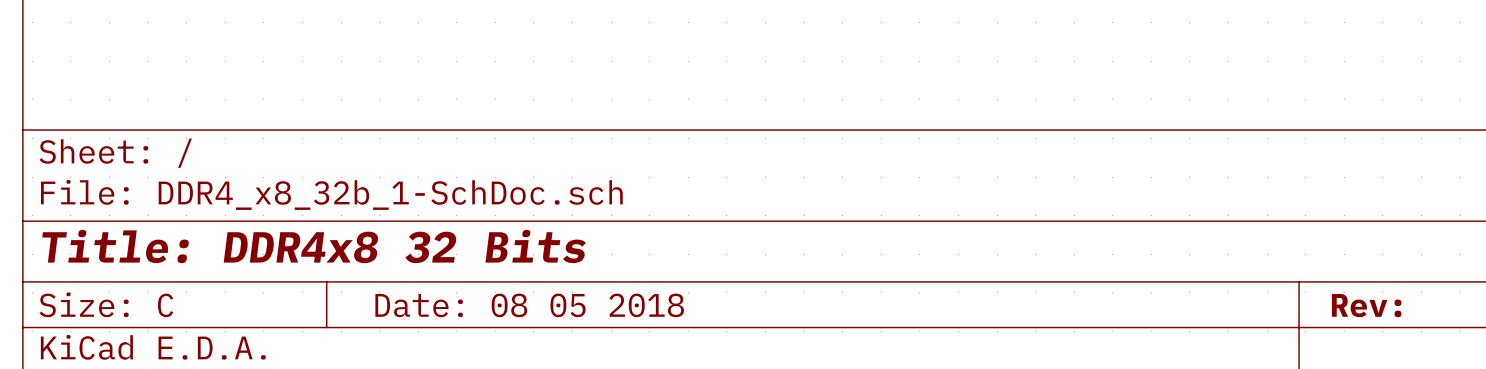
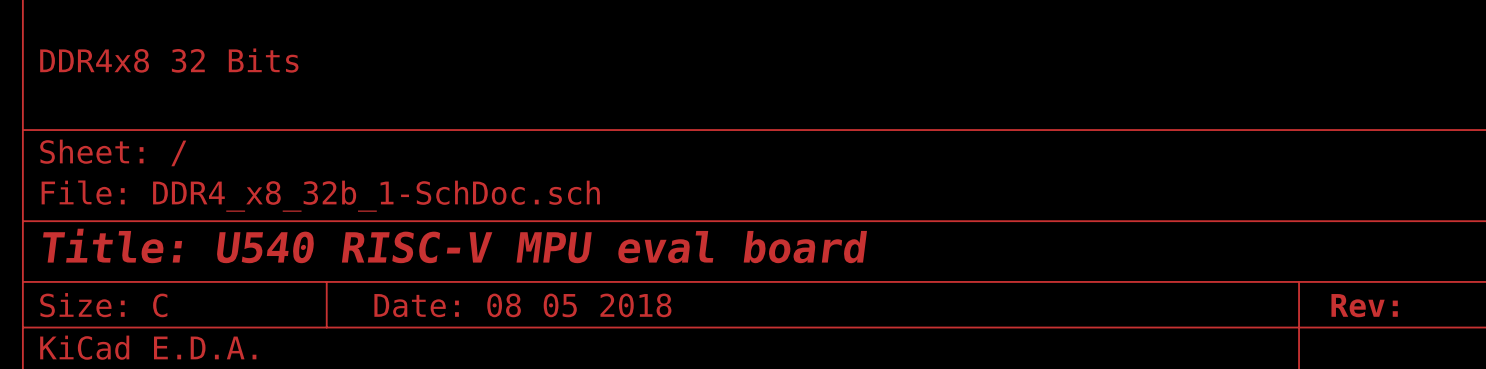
title block: none -> DDR4x8 32 Bits (169, 60)
title block: Title: DDR4x8 32 Bits (314, 246) -> Title: U540 RISC-V MPU eval board (455, 245)

